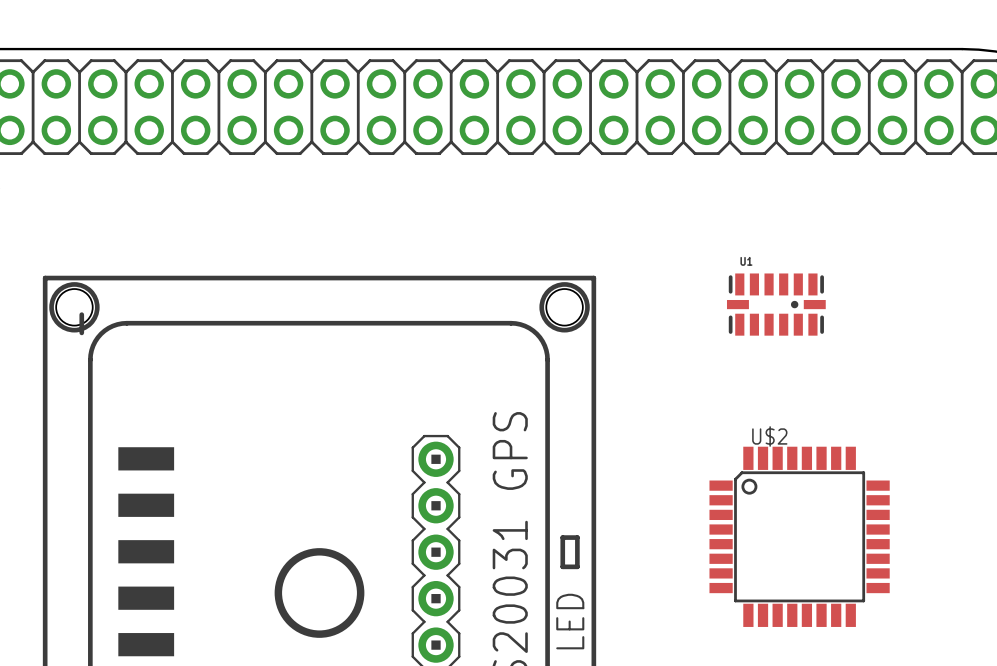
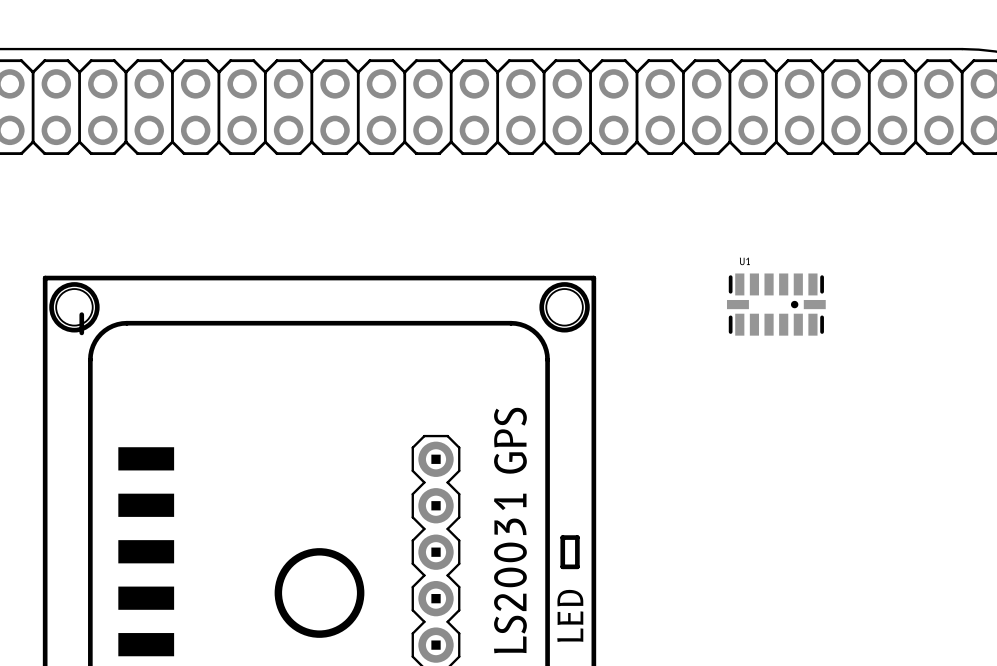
U$2: (799, 536) -> none

